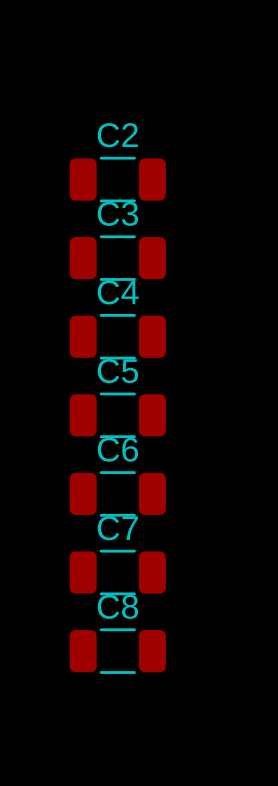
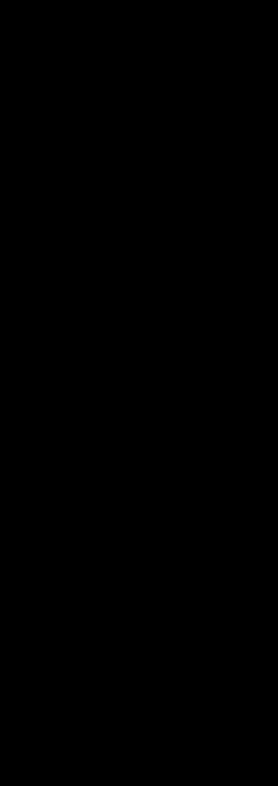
C2: (117, 179) -> none
C3: (117, 258) -> none
C4: (117, 336) -> none
C5: (117, 415) -> none
C6: (117, 493) -> none
C7: (117, 572) -> none
C8: (117, 651) -> none

